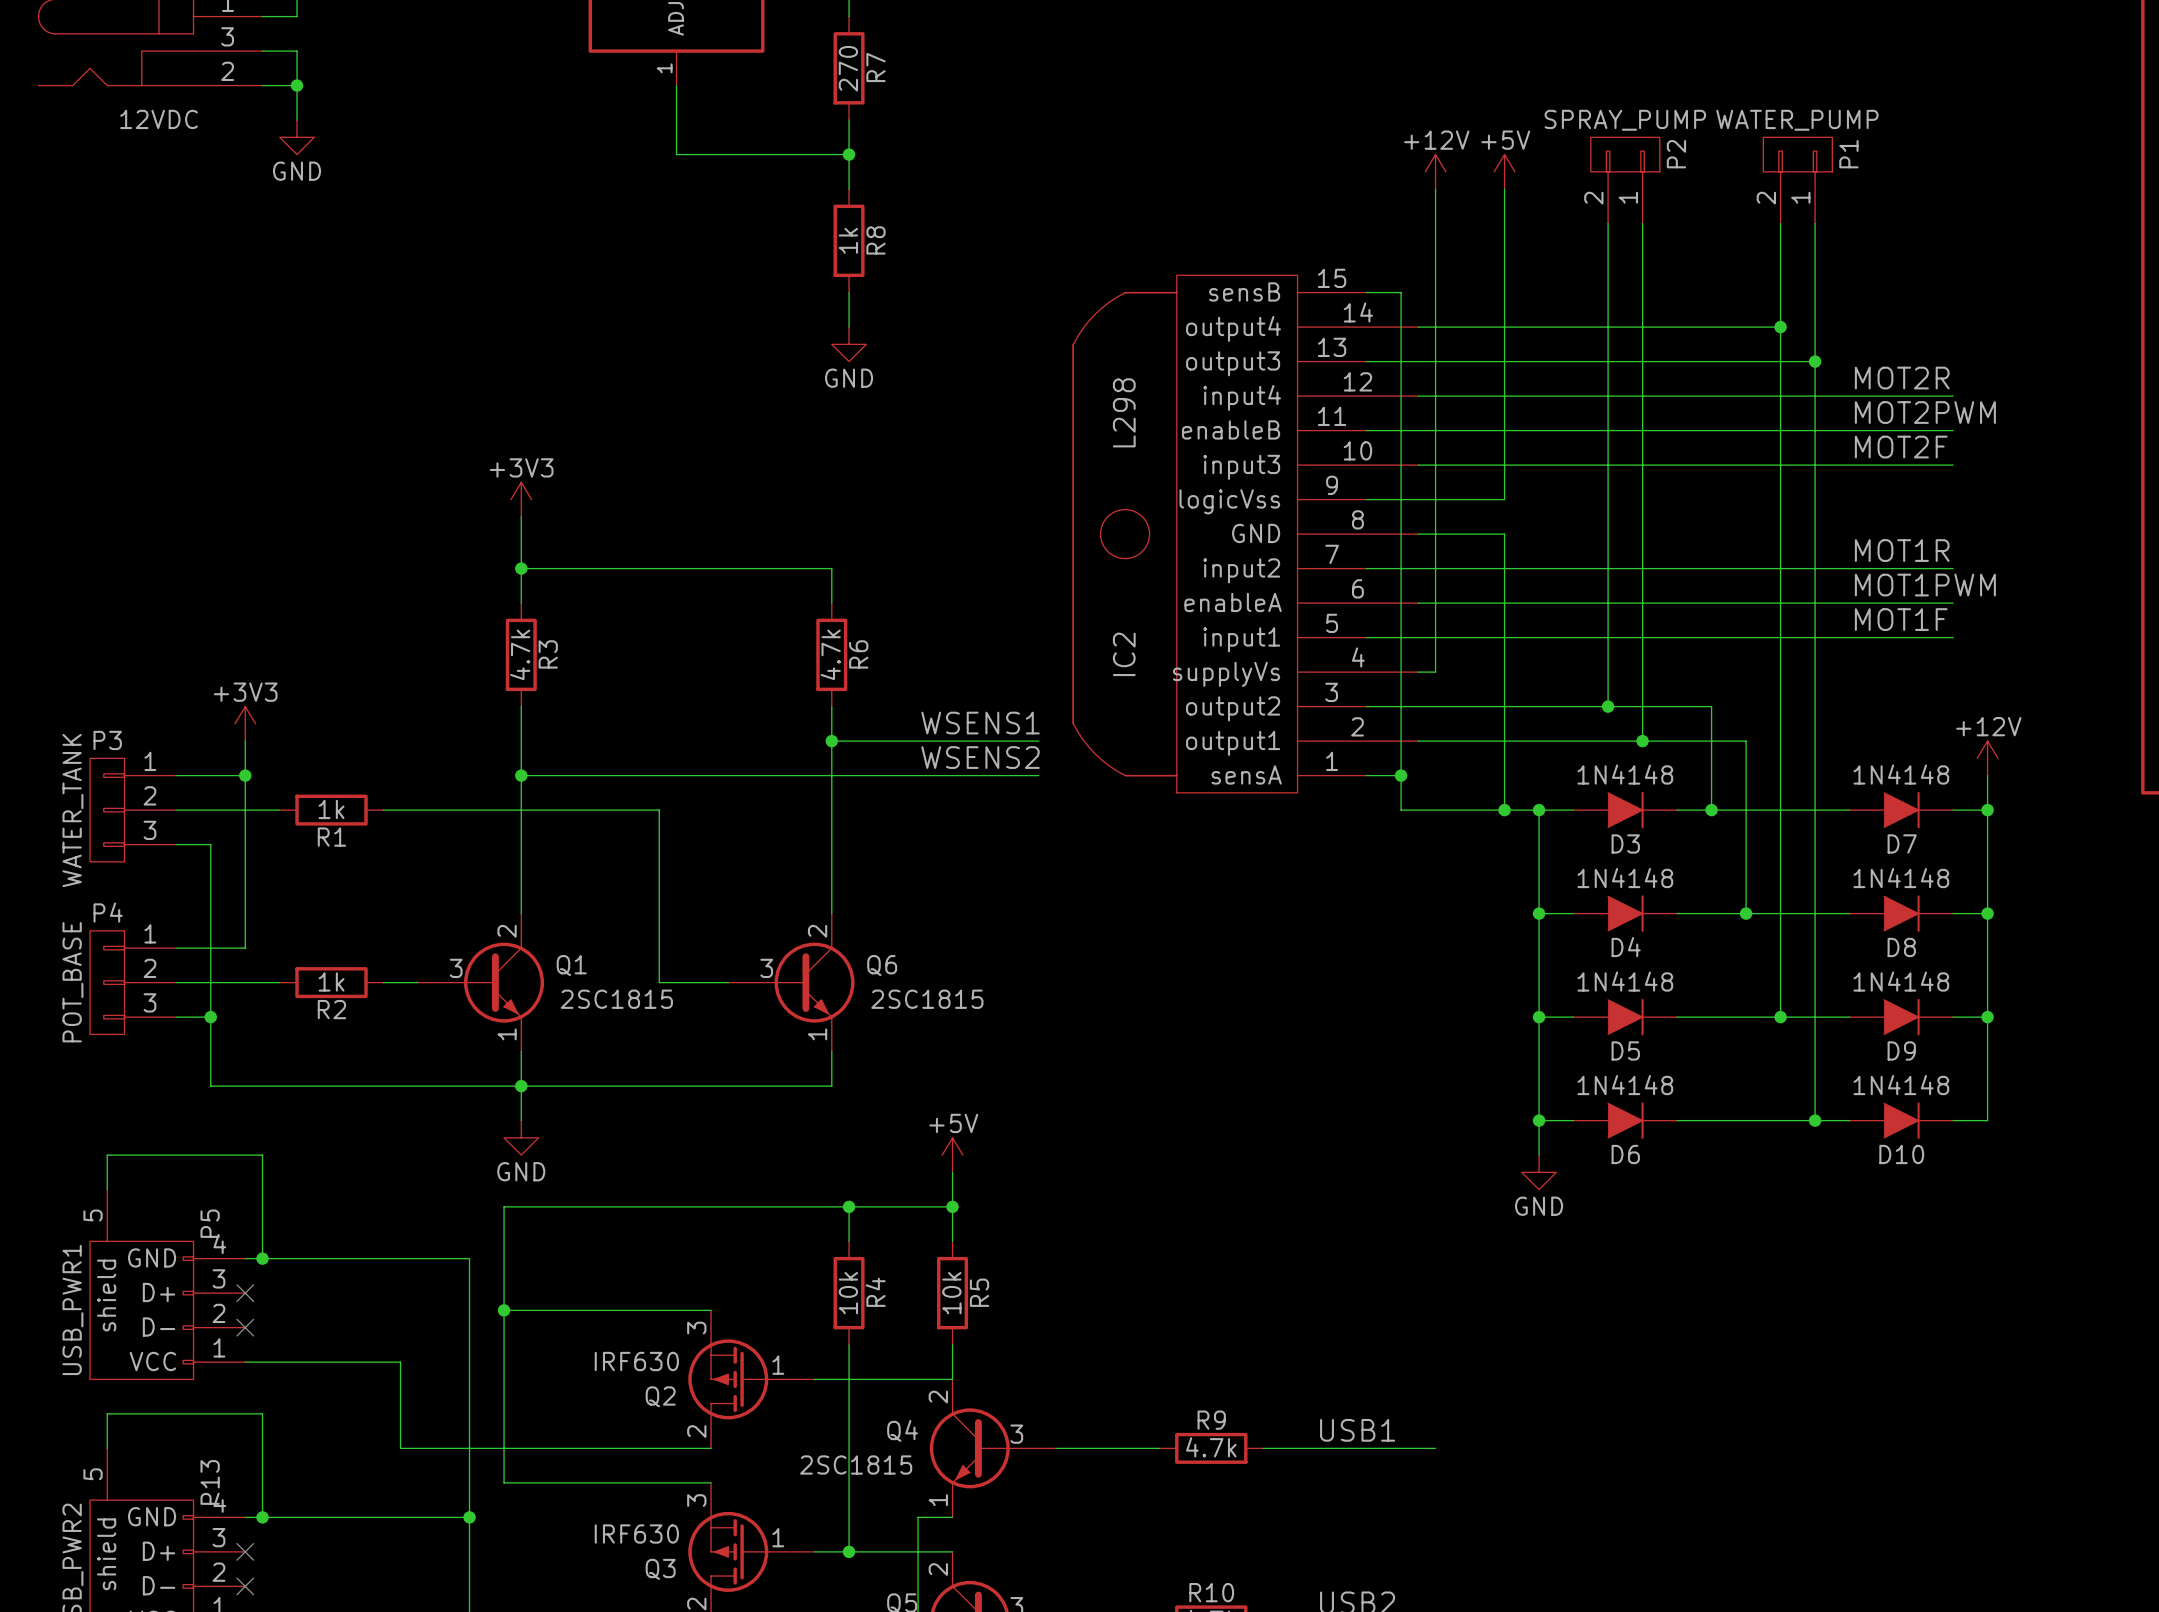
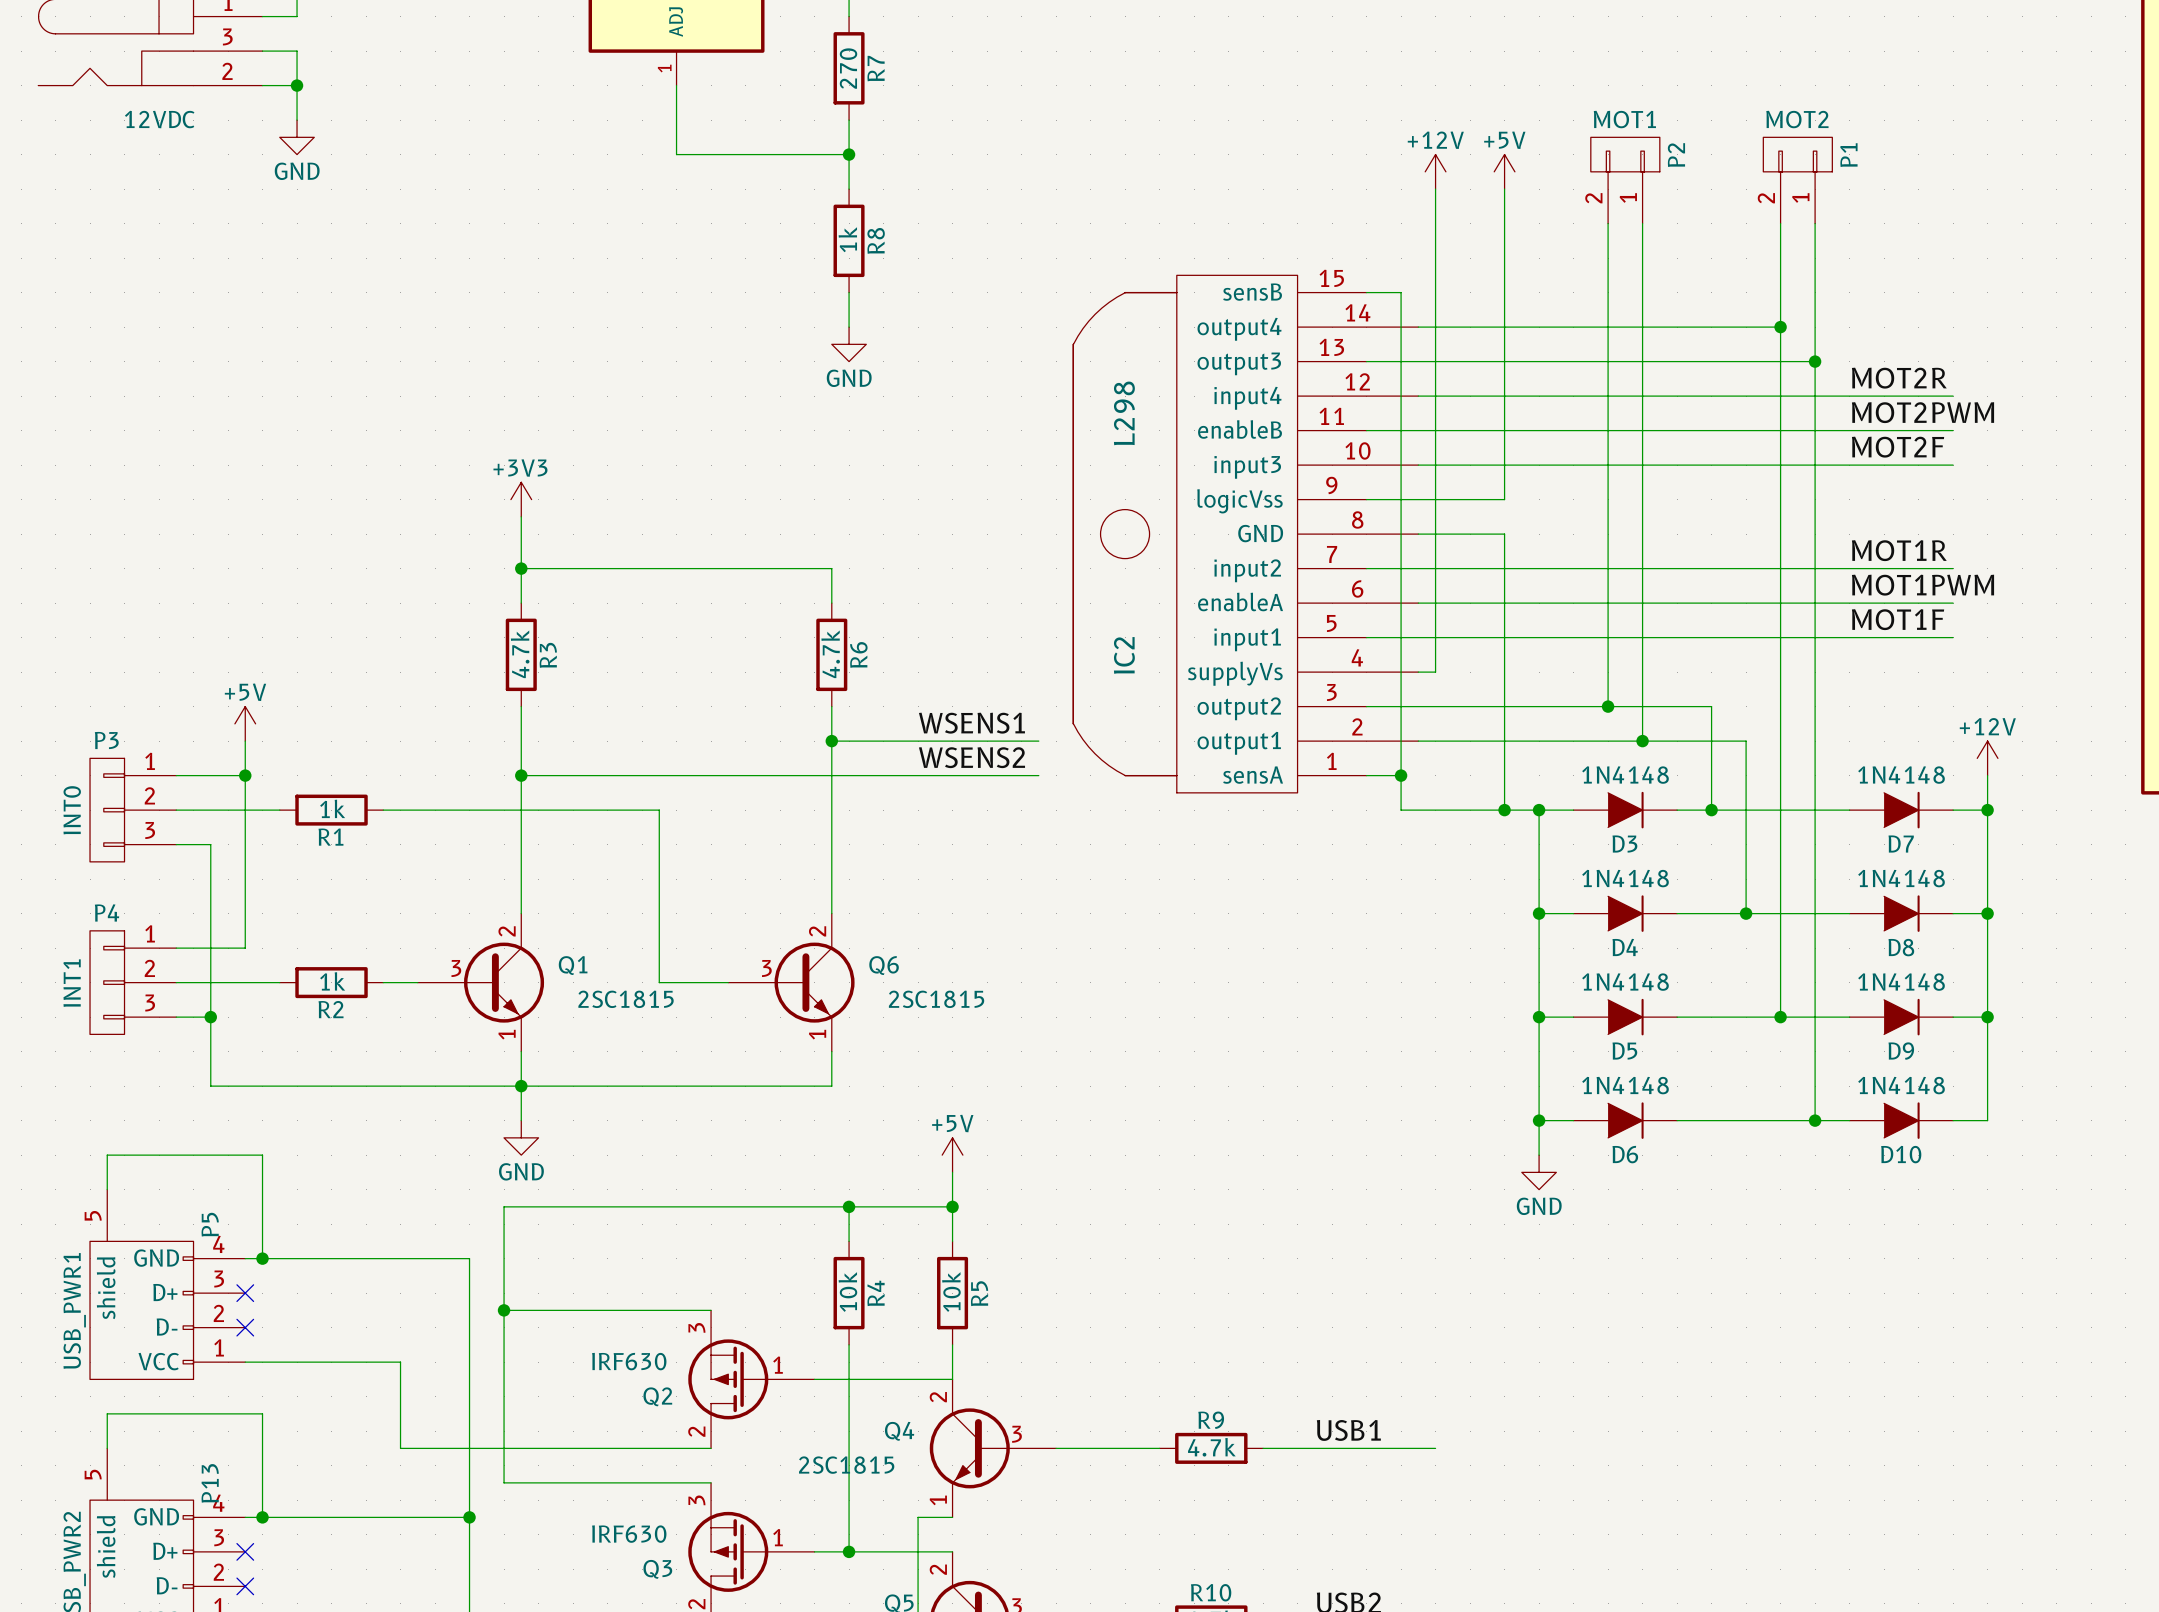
P2 value: SPRAY_PUMP (1625, 120) -> MOT1 (1624, 119)
P1 value: WATER_PUMP (1797, 120) -> MOT2 (1797, 119)
power symbol: +3V3 (245, 723) -> +5V (245, 723)
P3 value: WATER_TANK (72, 810) -> INT0 (72, 810)
P4 value: POT_BASE (72, 982) -> INT1 (72, 983)

